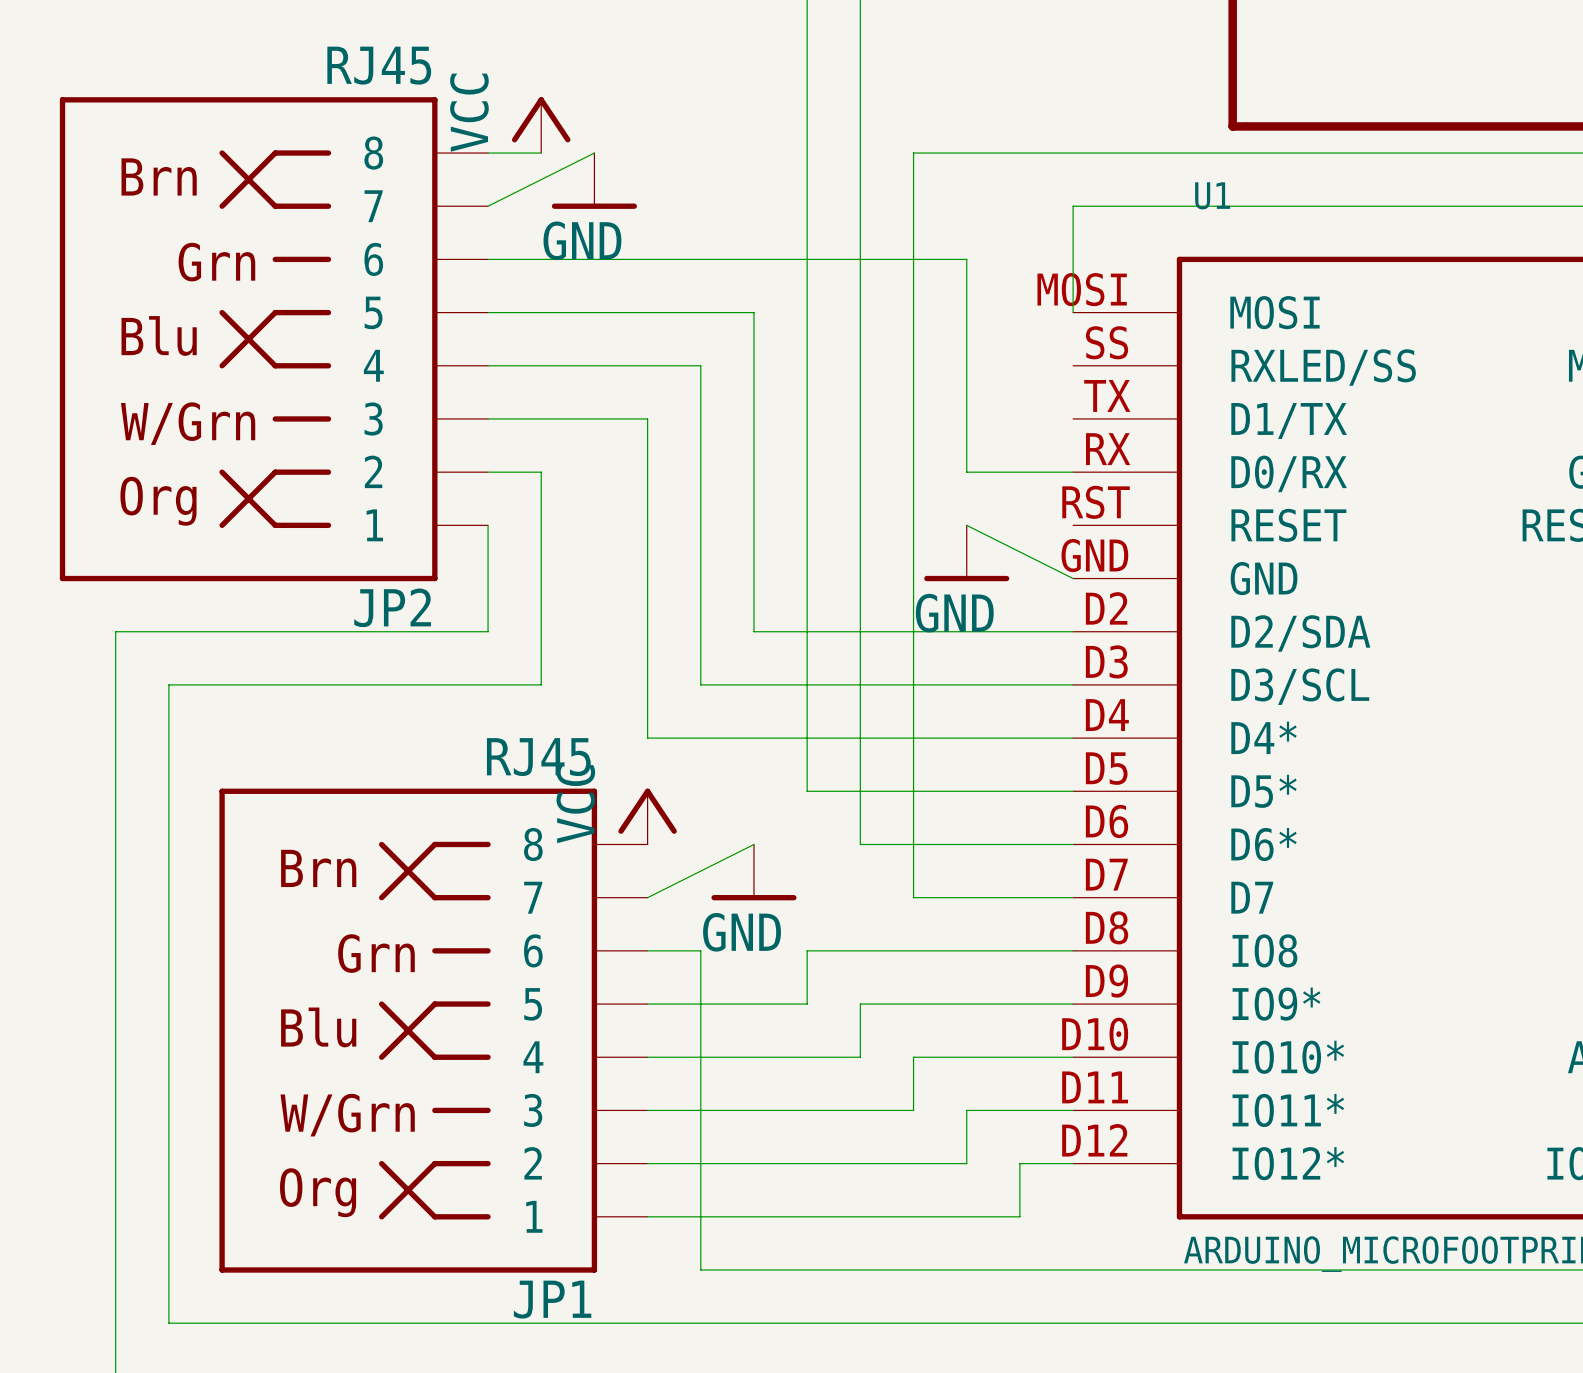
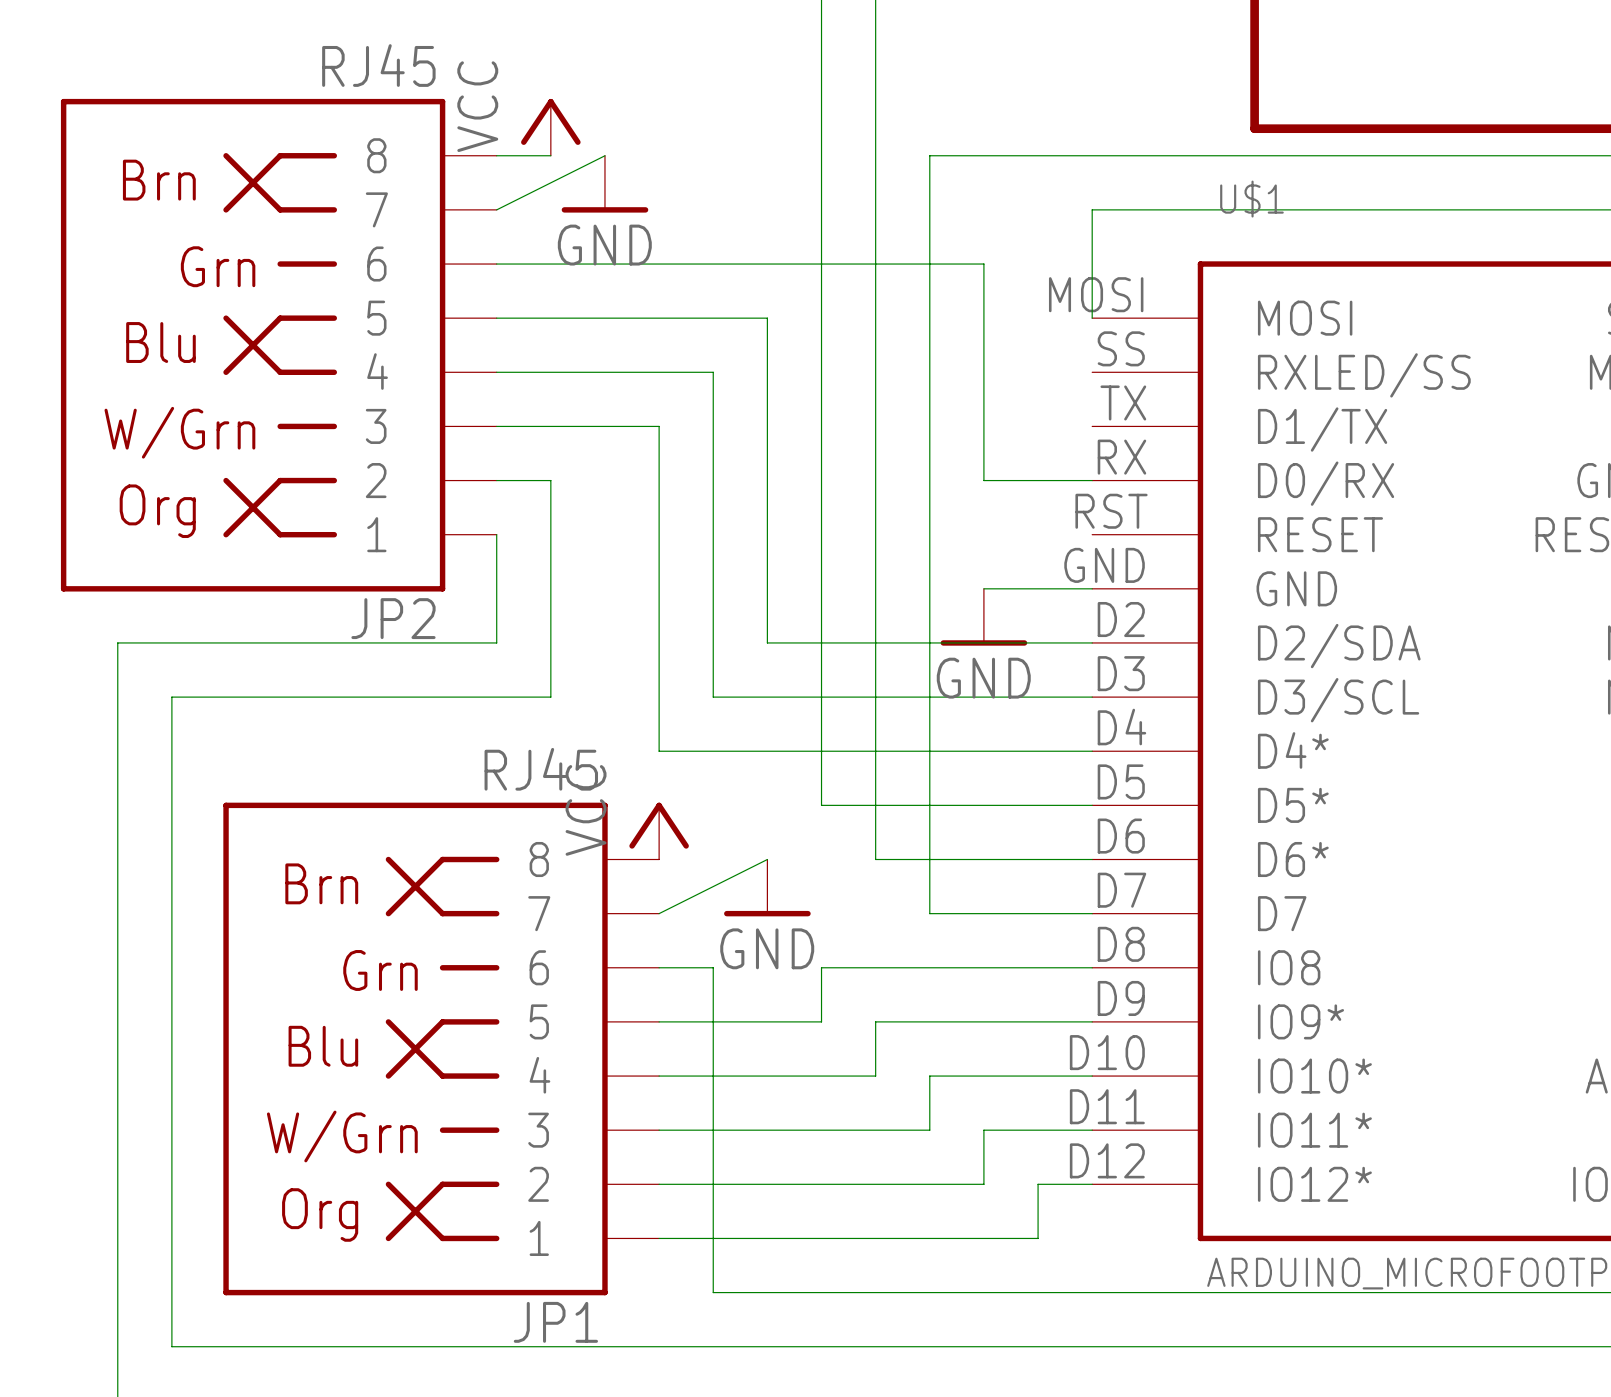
U1 name: U1 (1212, 195) -> U$1 (1251, 199)
wire: (966, 525) (1073, 578) -> (983, 588) (1092, 588)
power symbol position: GND (966, 553) -> GND (983, 617)

